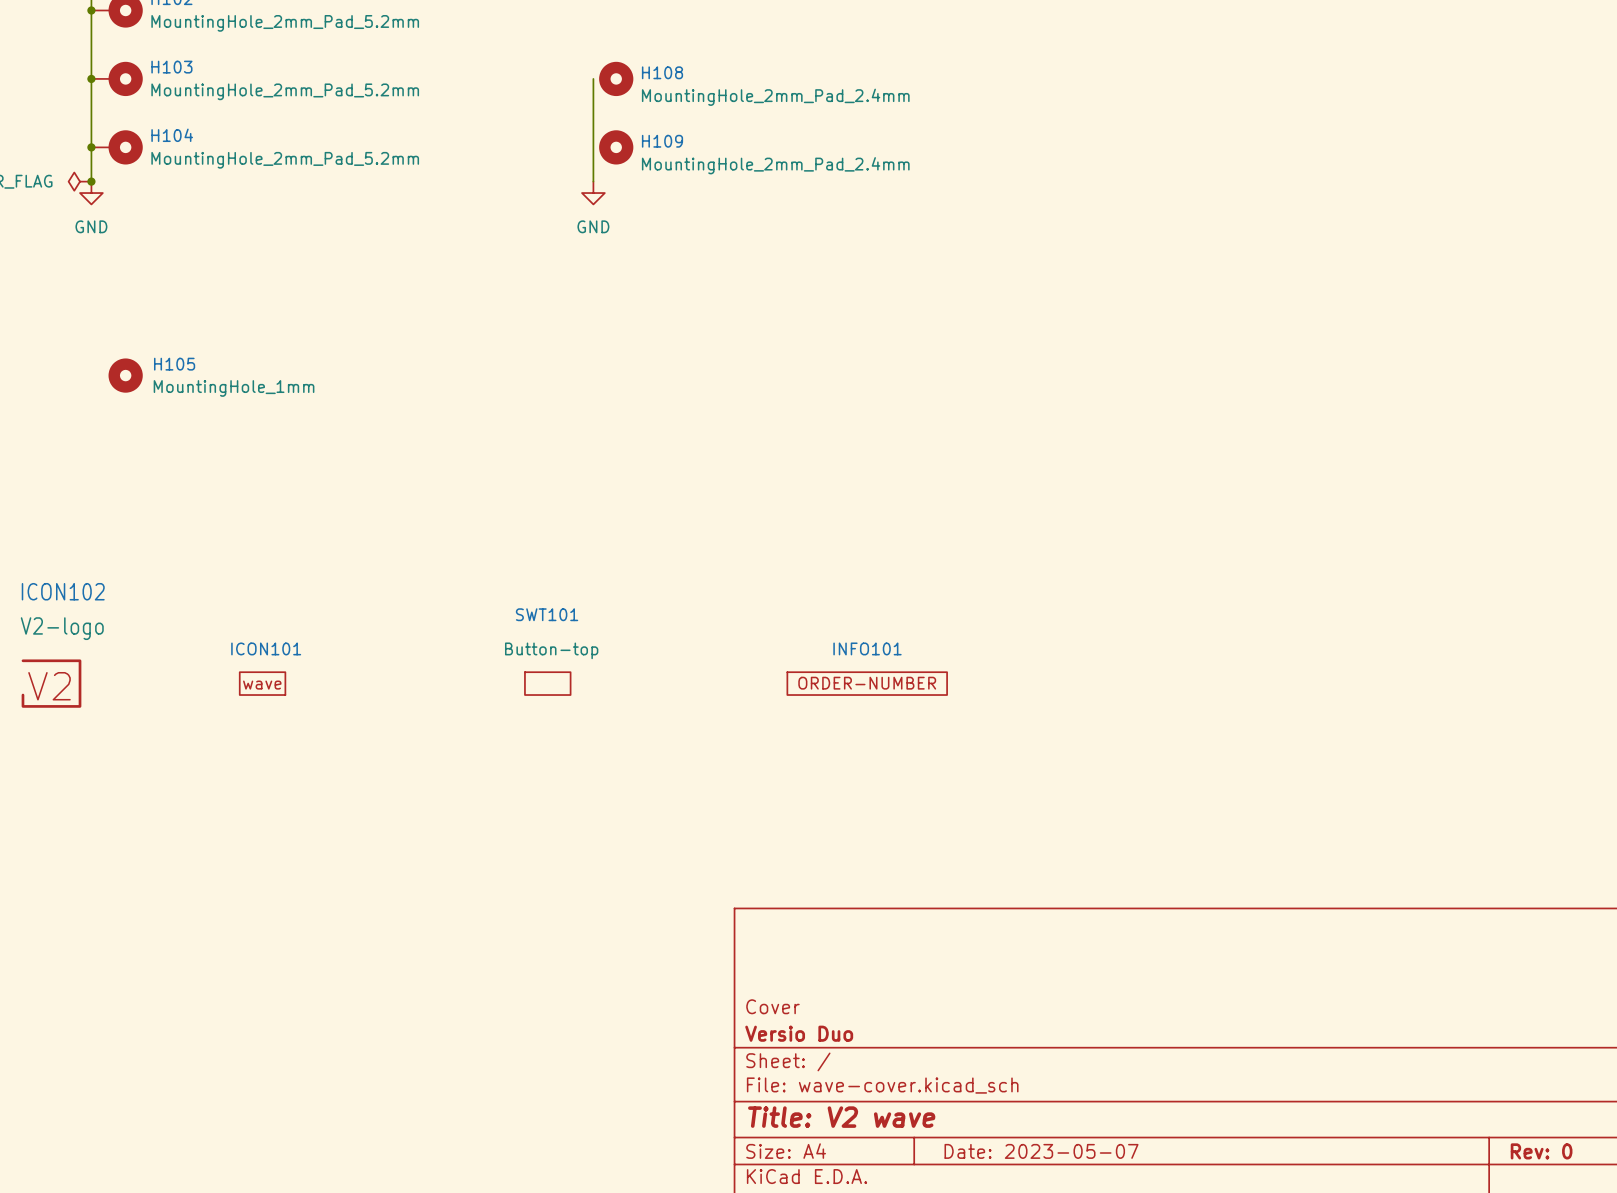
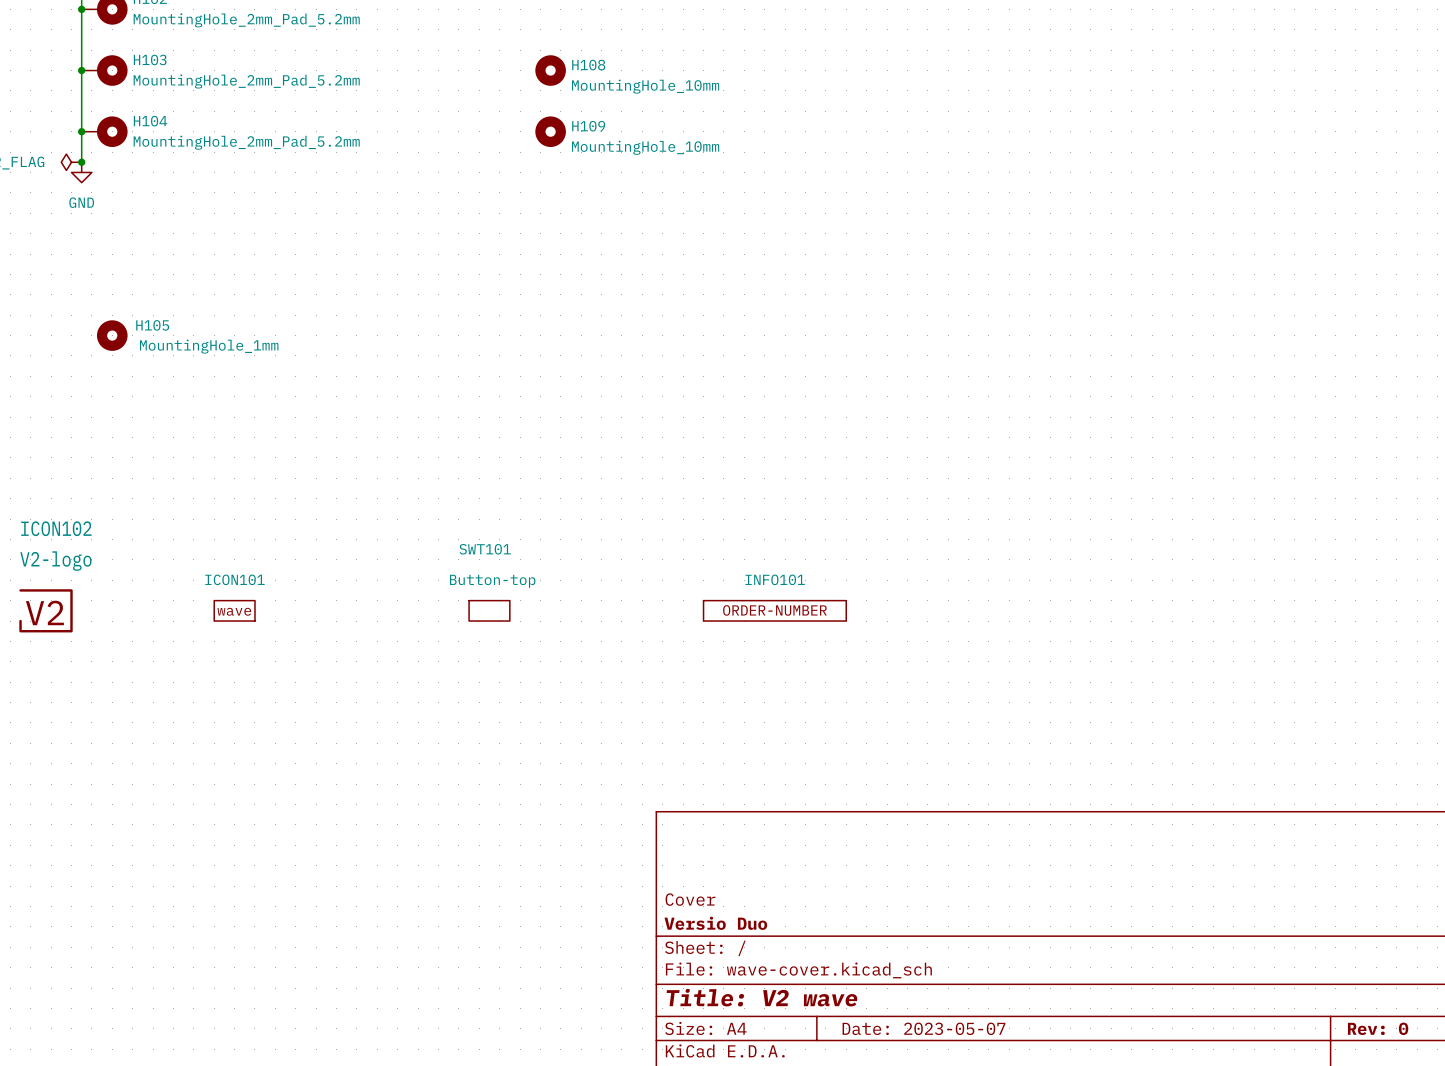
wire: (593, 78) (593, 181) -> none
H108 value: MountingHole_2mm_Pad_2.4mm (775, 97) -> MountingHole_10mm (645, 86)
H109 value: MountingHole_2mm_Pad_2.4mm (775, 165) -> MountingHole_10mm (645, 147)
power symbol: GND (593, 193) -> none

